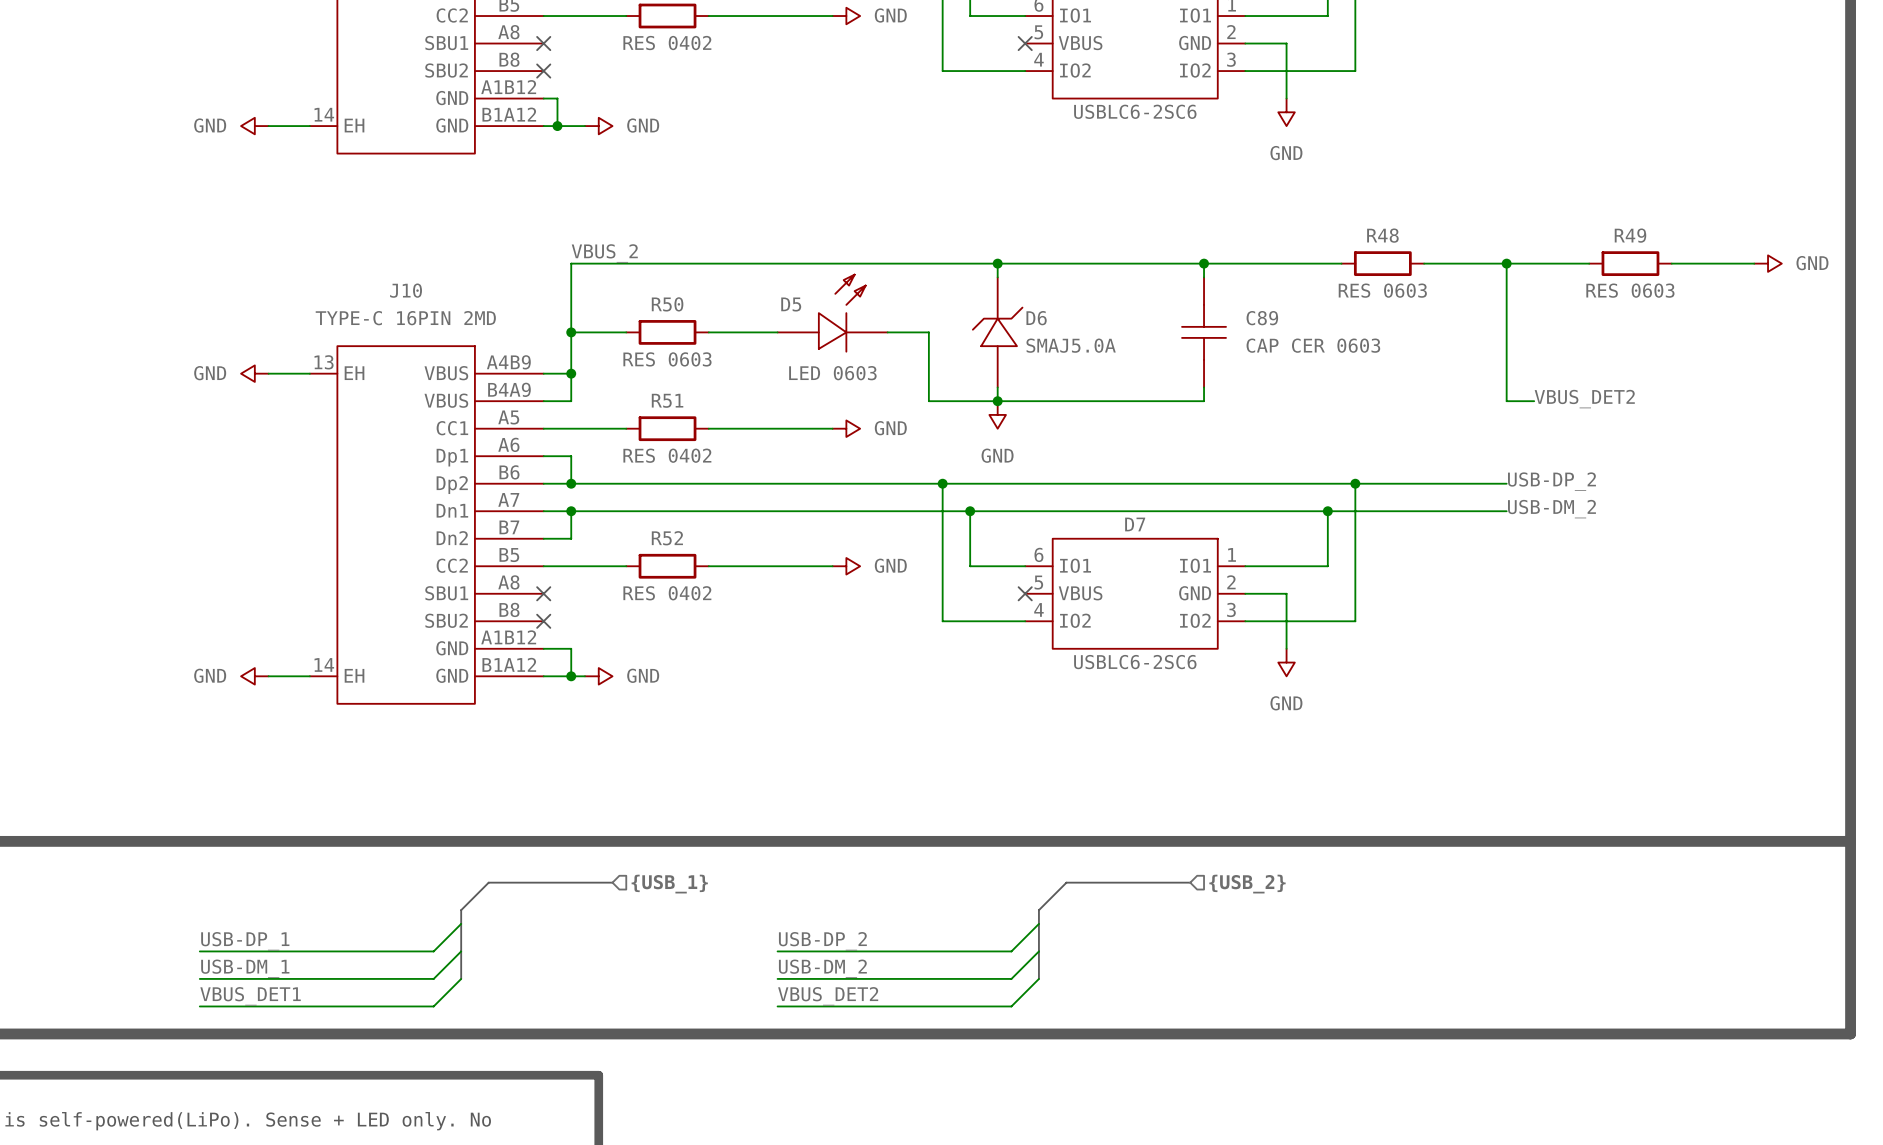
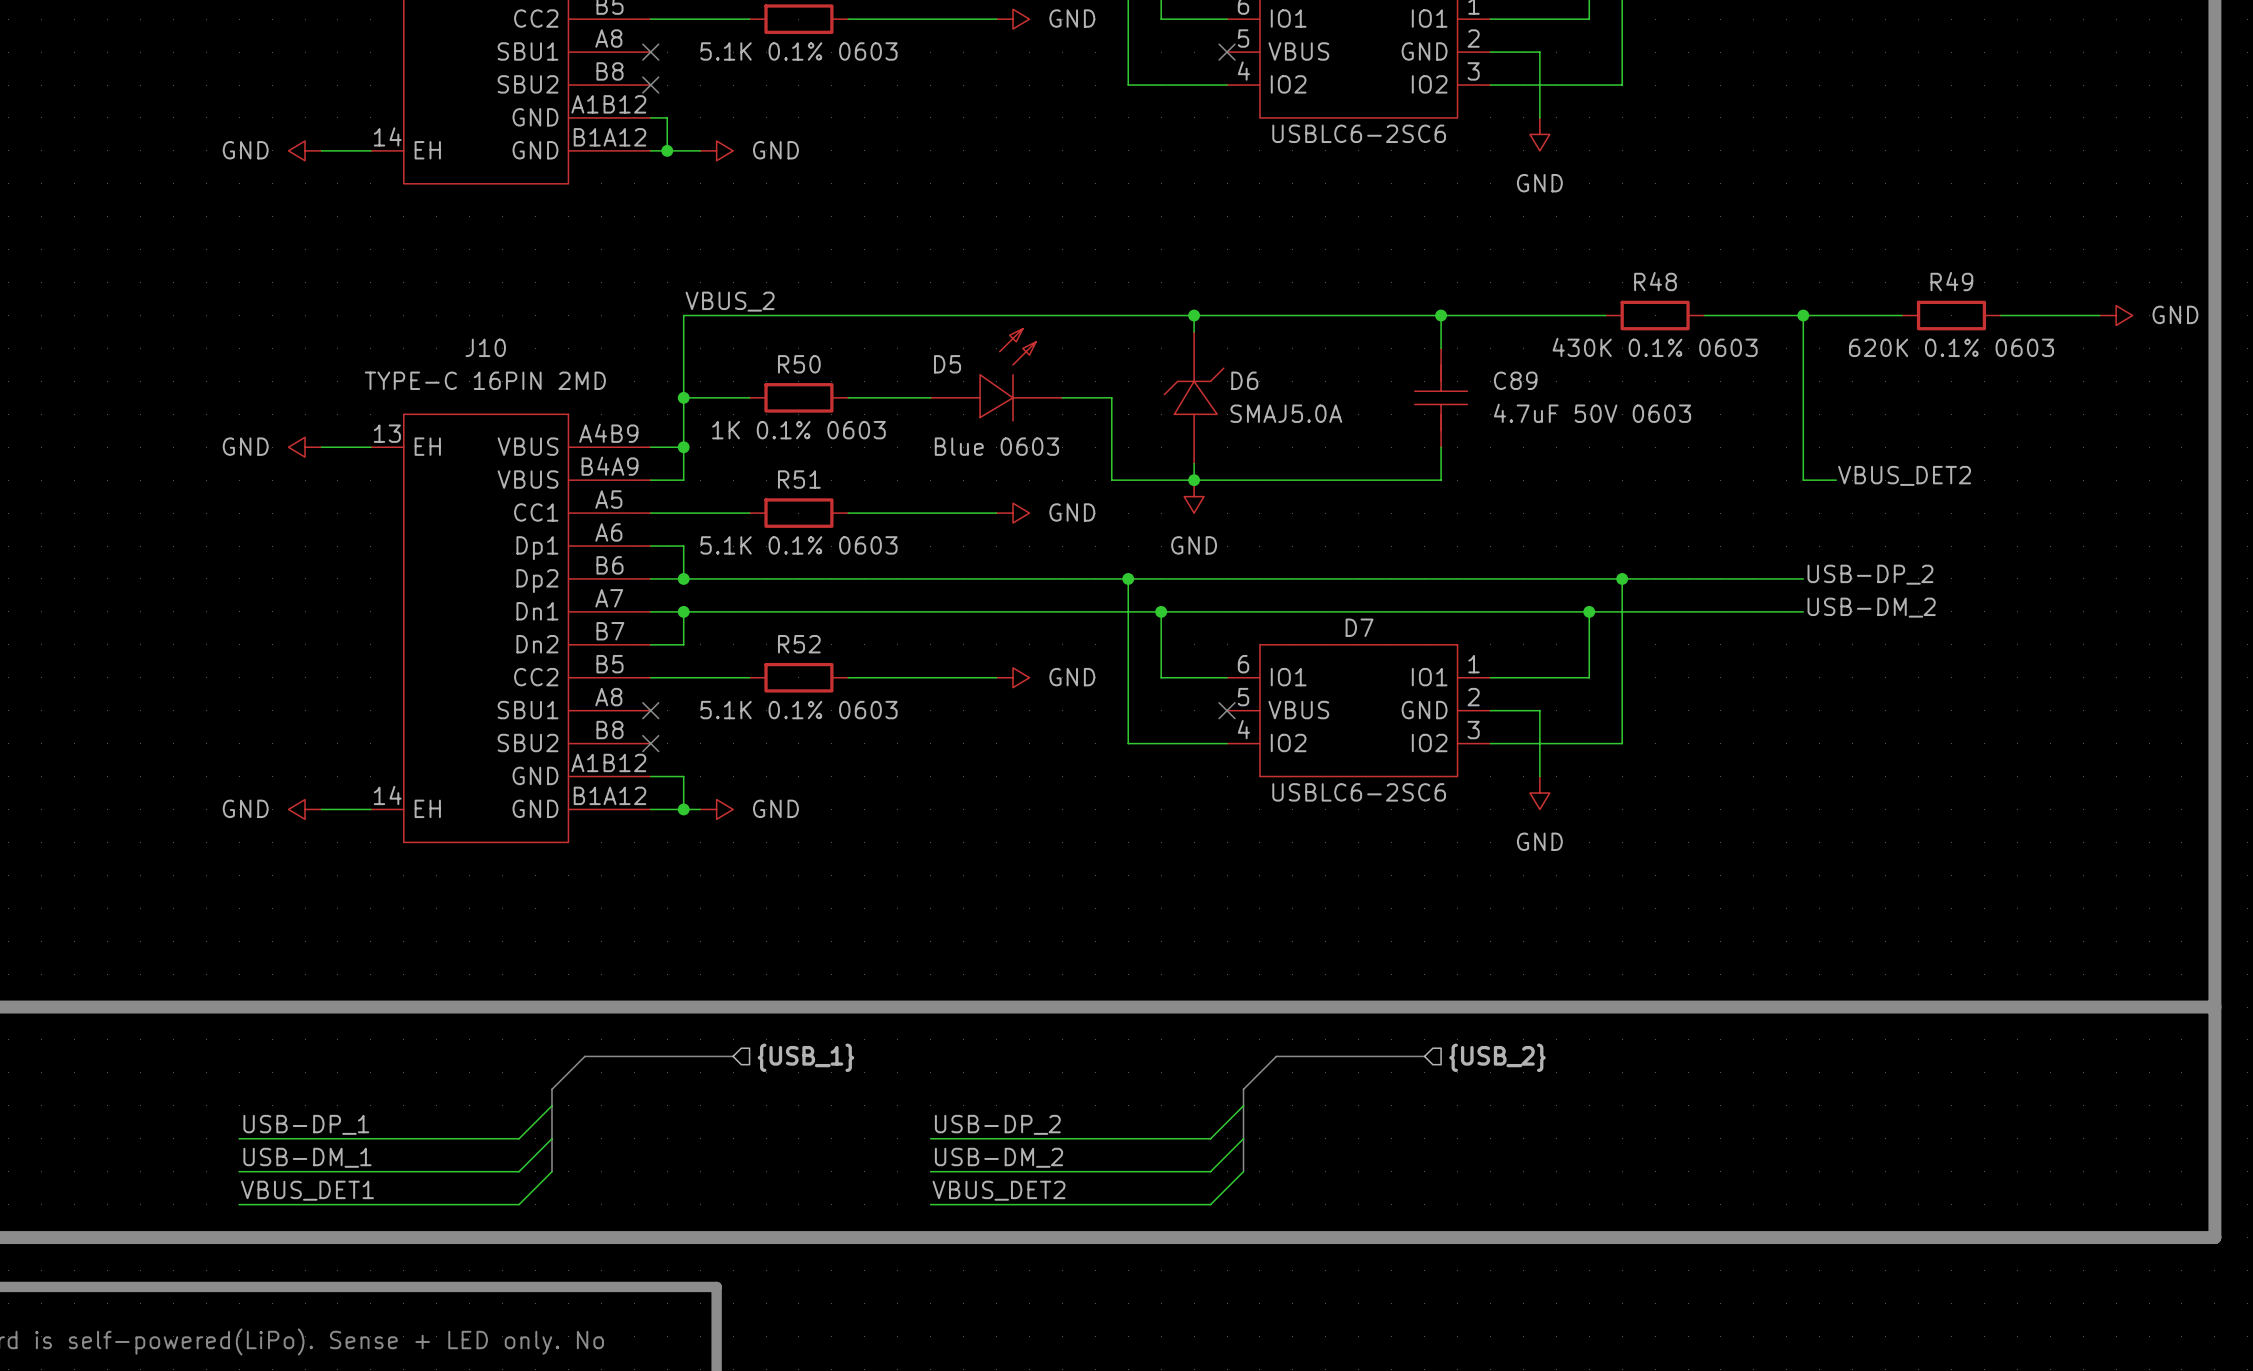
part value: RES 0402 (667, 43) -> 5.1K 0.1% 0603 (798, 51)
C89 symbol: [1182, 277, 1227, 388] -> [1414, 348, 1468, 448]
R48 value: RES 0603 (1382, 290) -> 430K 0.1% 0603 (1655, 347)
R49 value: RES 0603 (1630, 290) -> 620K 0.1% 0603 (1951, 347)
C89 value: CAP CER 0603 (1313, 345) -> 4.7uF 50V 0603 (1592, 413)
R50 value: RES 0603 (667, 359) -> 1K 0.1% 0603 (798, 430)
D5 value: LED 0603 (832, 373) -> Blue 0603 (996, 446)
R51 value: RES 0402 (667, 455) -> 5.1K 0.1% 0603 (798, 545)
R52 value: RES 0402 (667, 593) -> 5.1K 0.1% 0603 (798, 710)

